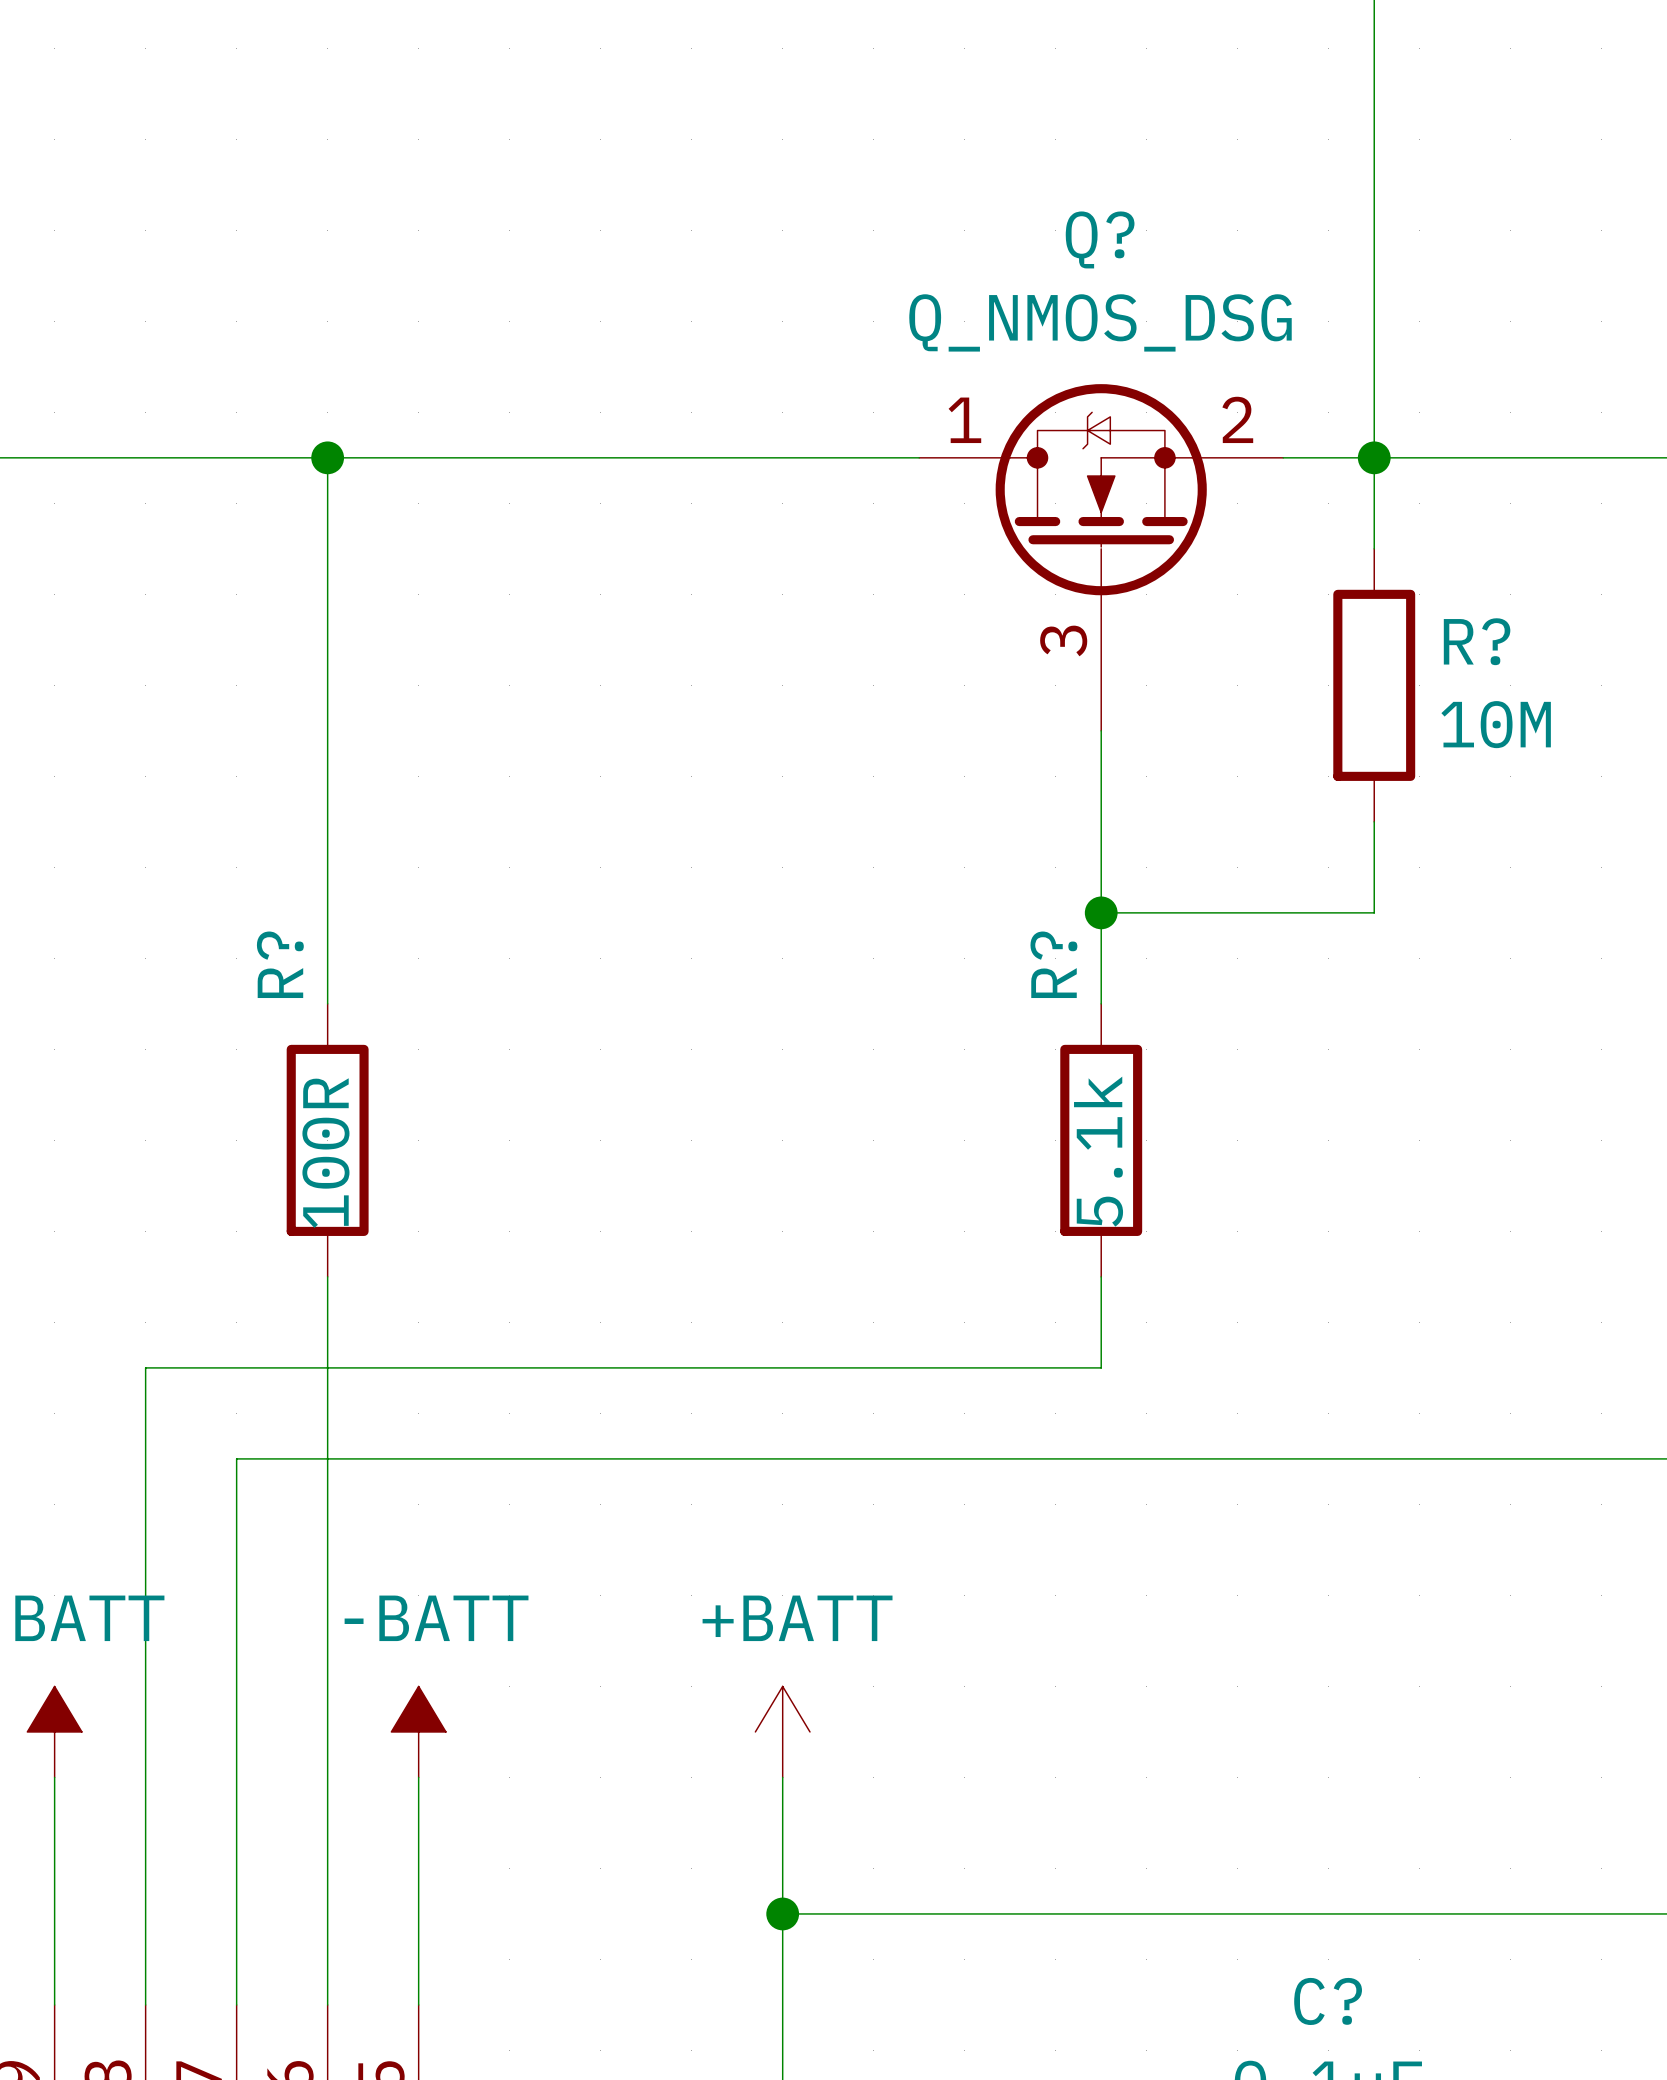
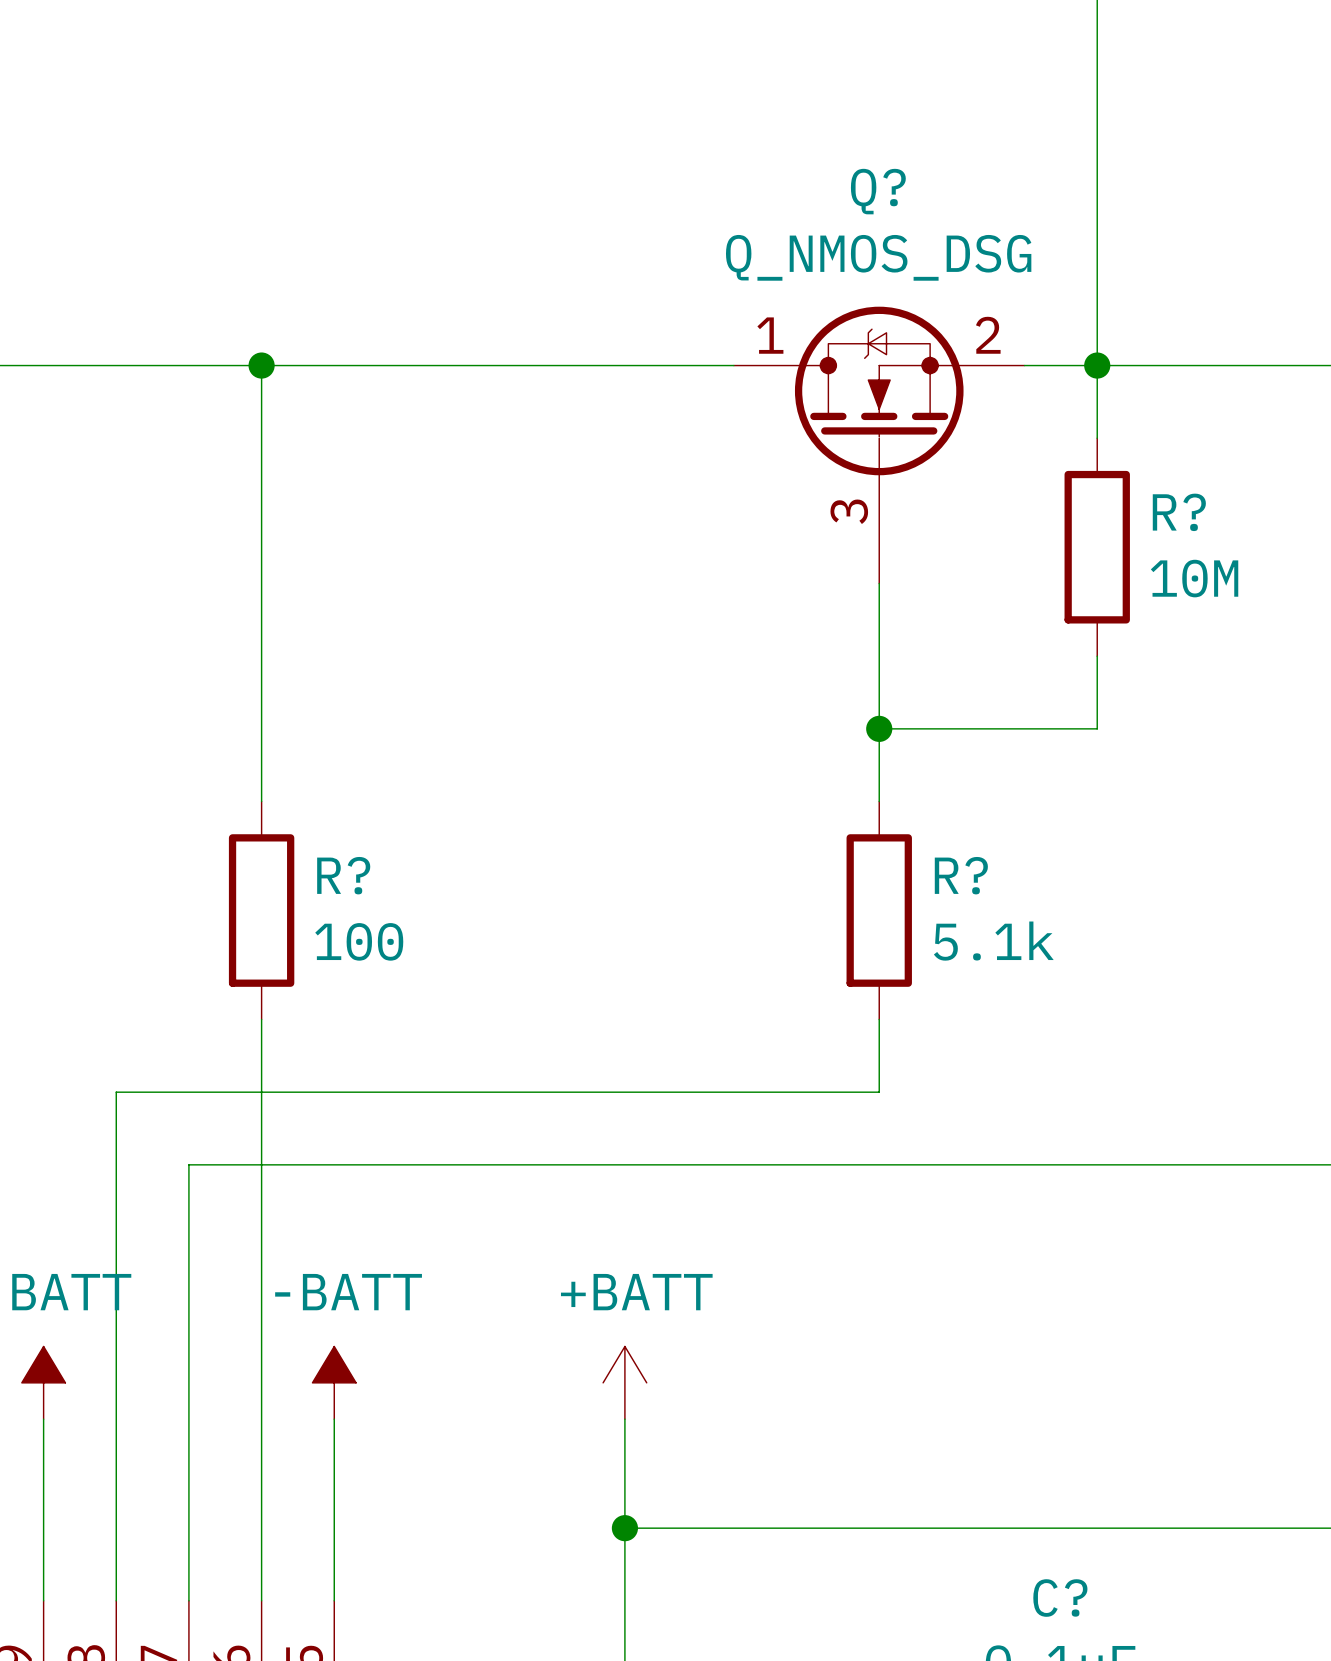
R? name rotation: 0° (280, 964) -> 90° clockwise (343, 875)
R? name position: R? (280, 964) -> R? (343, 875)
R? name rotation: 0° (1053, 964) -> 90° clockwise (961, 875)
R? name position: R? (1053, 964) -> R? (961, 875)
R? value rotation: 0° (1098, 1151) -> 90° clockwise (993, 941)
R? value: 100R (325, 1153) -> 100 (359, 941)

